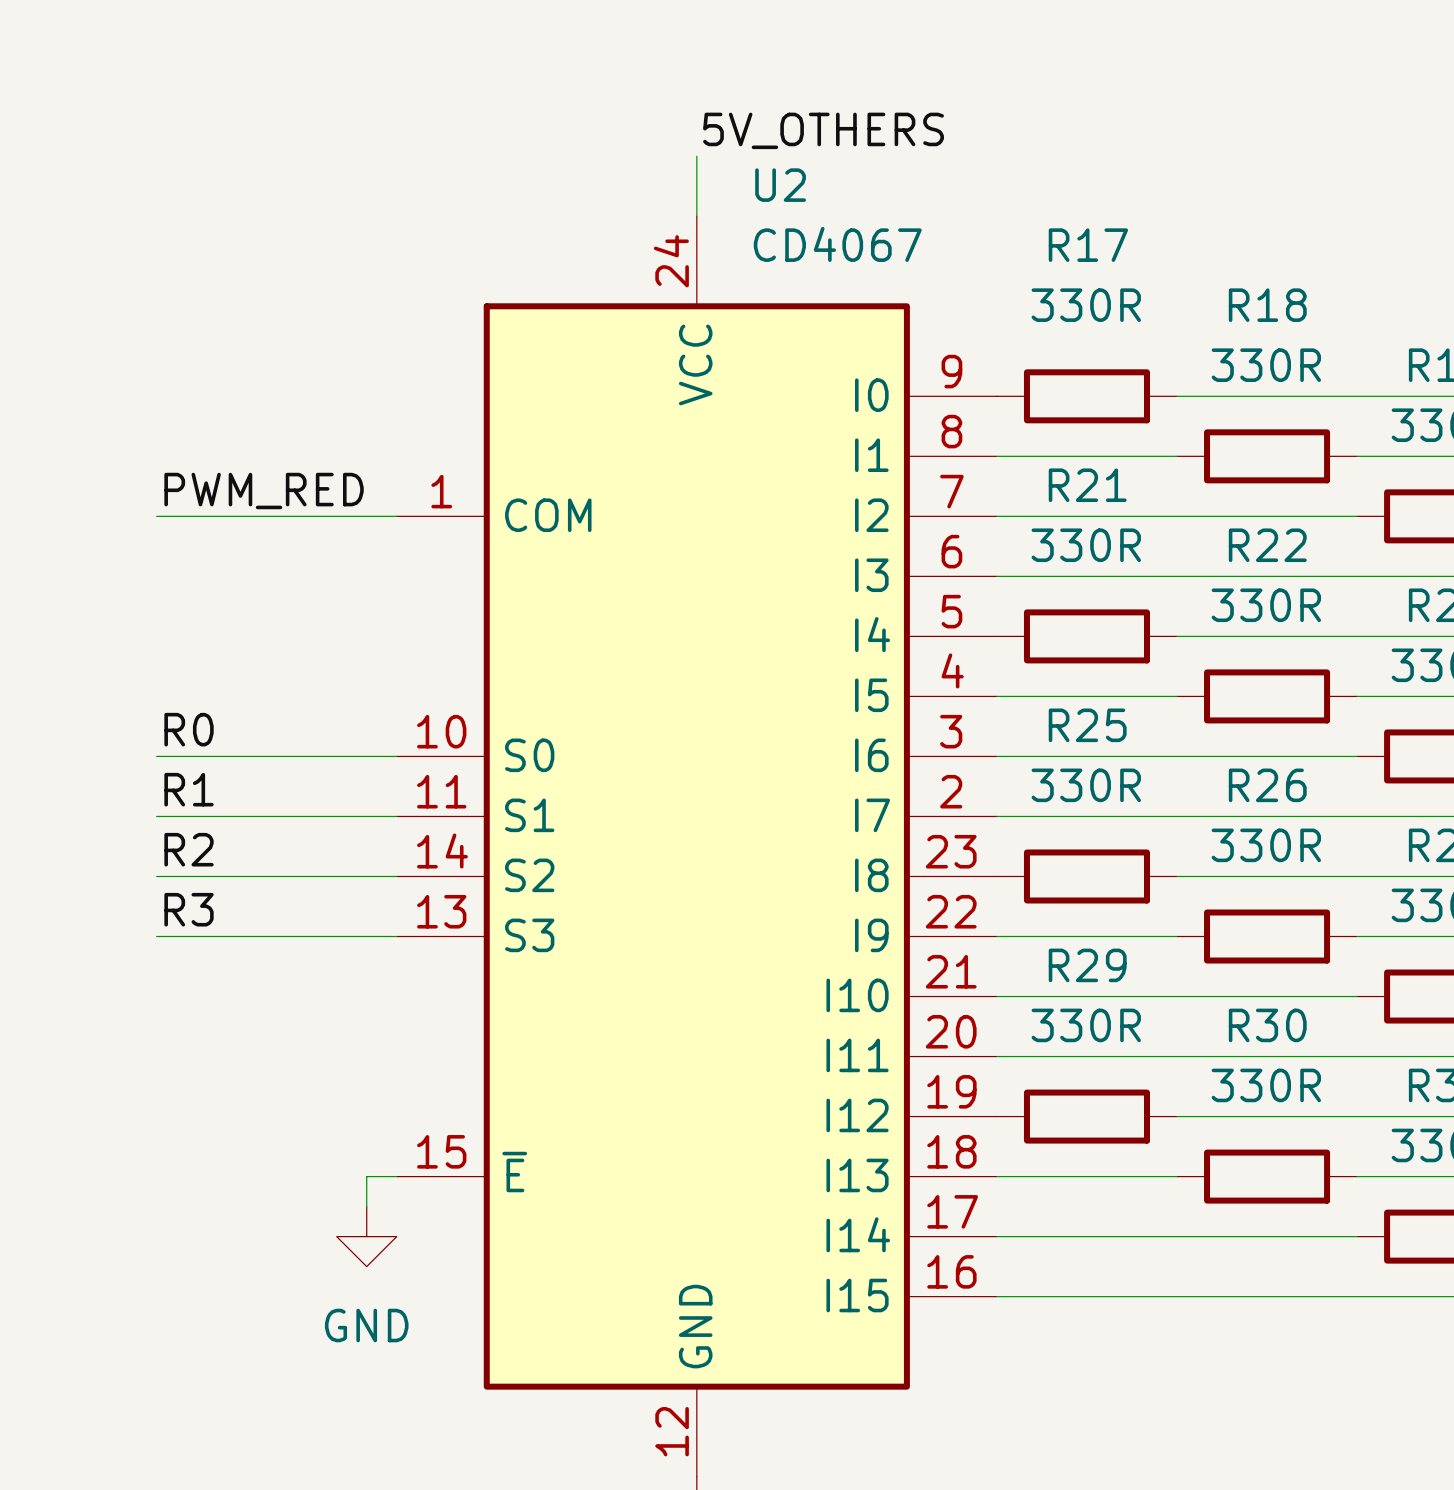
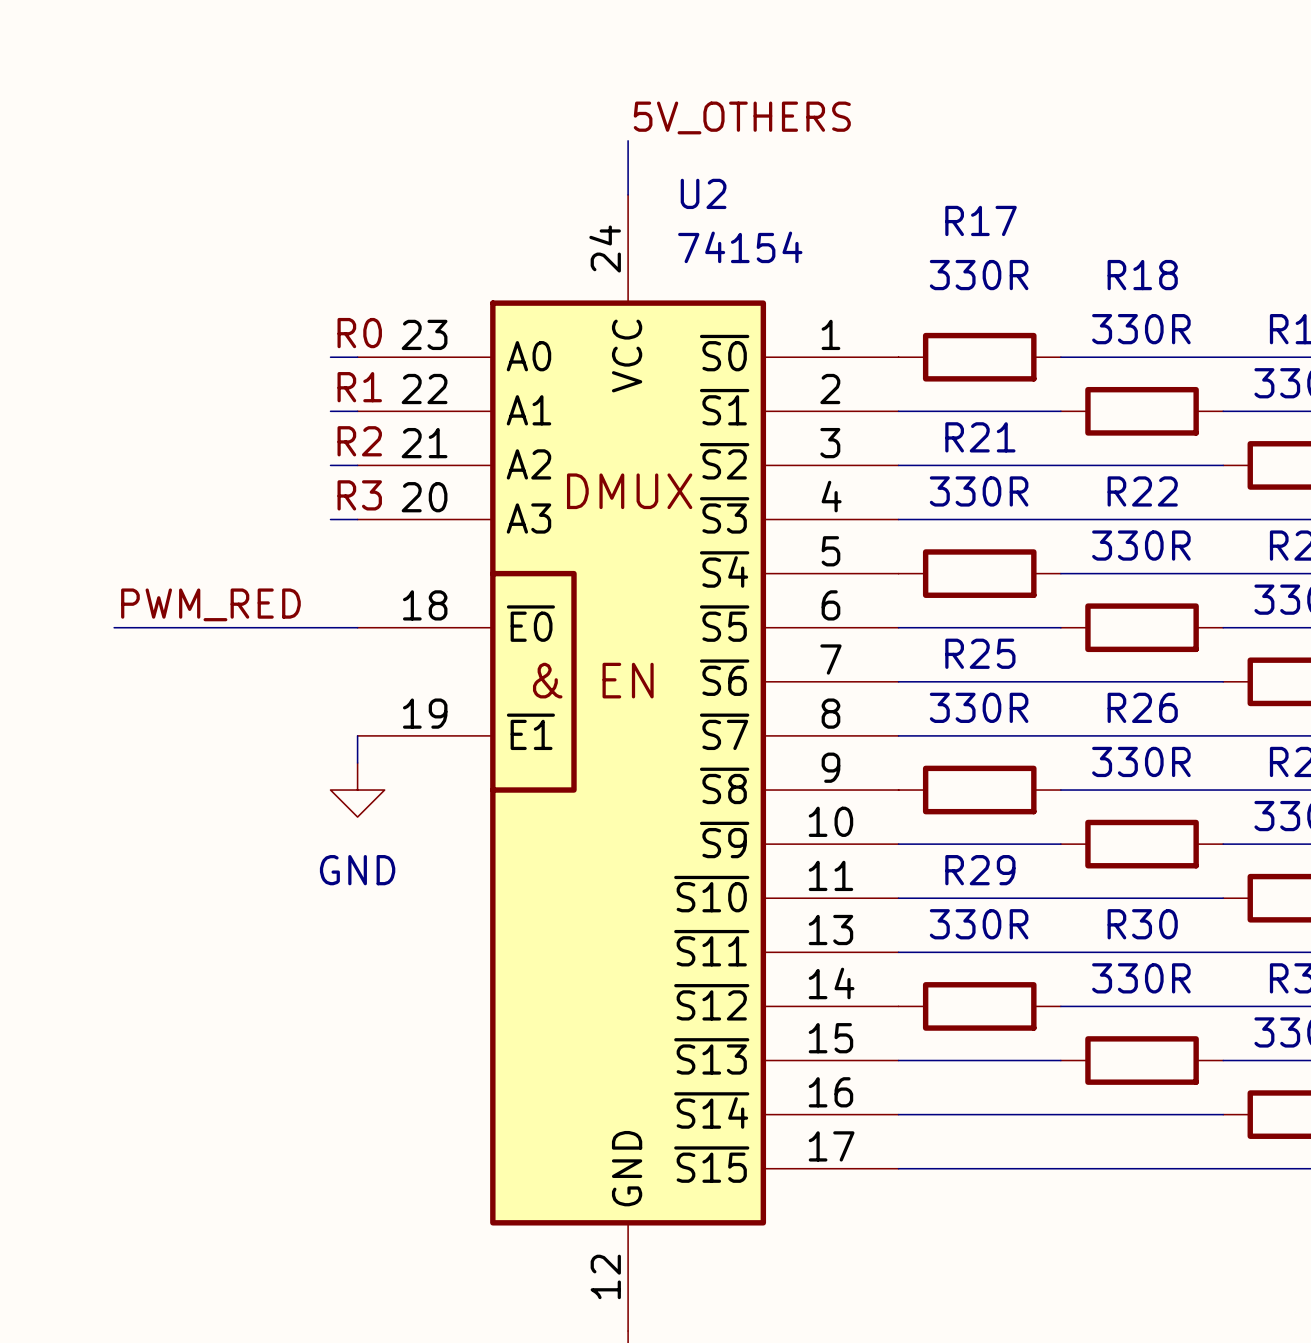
U2 symbol: [396, 216, 997, 1477] -> [357, 194, 899, 1332]
U2 value: CD4067 (837, 244) -> 74154 (740, 247)
wire: none -> (330, 357) (357, 357)
wire: none -> (330, 411) (357, 411)
label position: PWM_RED (264, 491) -> PWM_RED (210, 604)
wire: (156, 516) (366, 516) -> none
wire: none -> (330, 519) (357, 519)
wire: none -> (114, 627) (357, 627)
label position: R0 (189, 729) -> R0 (359, 333)
wire: (156, 756) (396, 756) -> none
label position: R1 (189, 789) -> R1 (359, 387)
wire: (156, 816) (396, 816) -> (357, 762) (357, 735)
label position: R2 (189, 849) -> R2 (359, 441)
wire: (156, 876) (396, 876) -> none
label position: R3 (189, 909) -> R3 (359, 495)
wire: (156, 936) (396, 936) -> none
wire: (396, 1176) (366, 1176) (366, 1206) -> none
power symbol position: GND (366, 1236) -> GND (357, 790)

